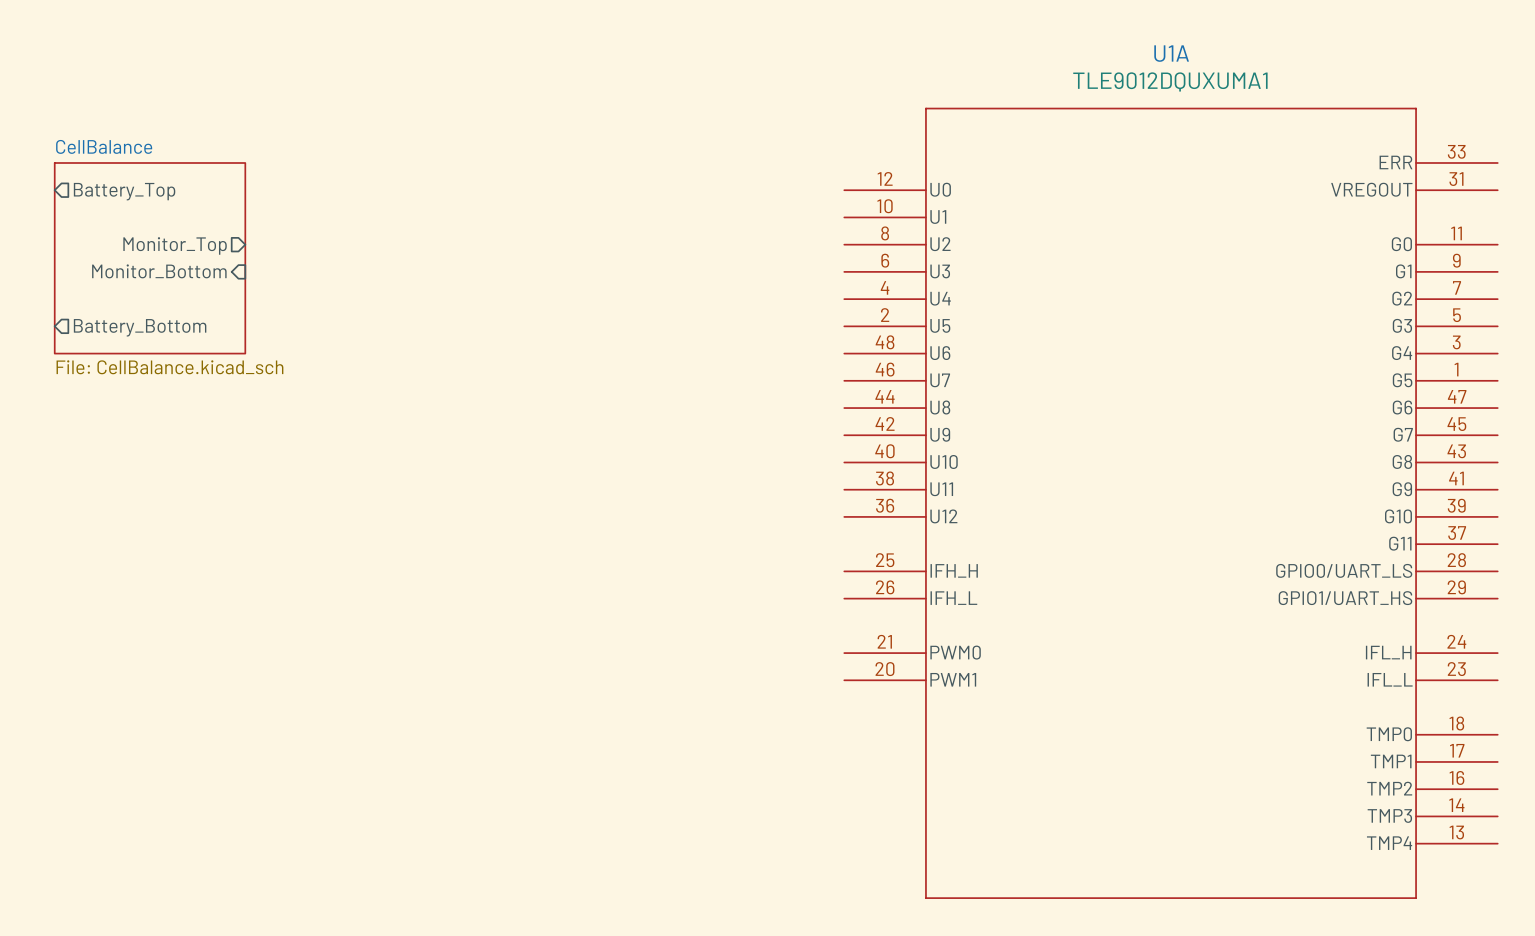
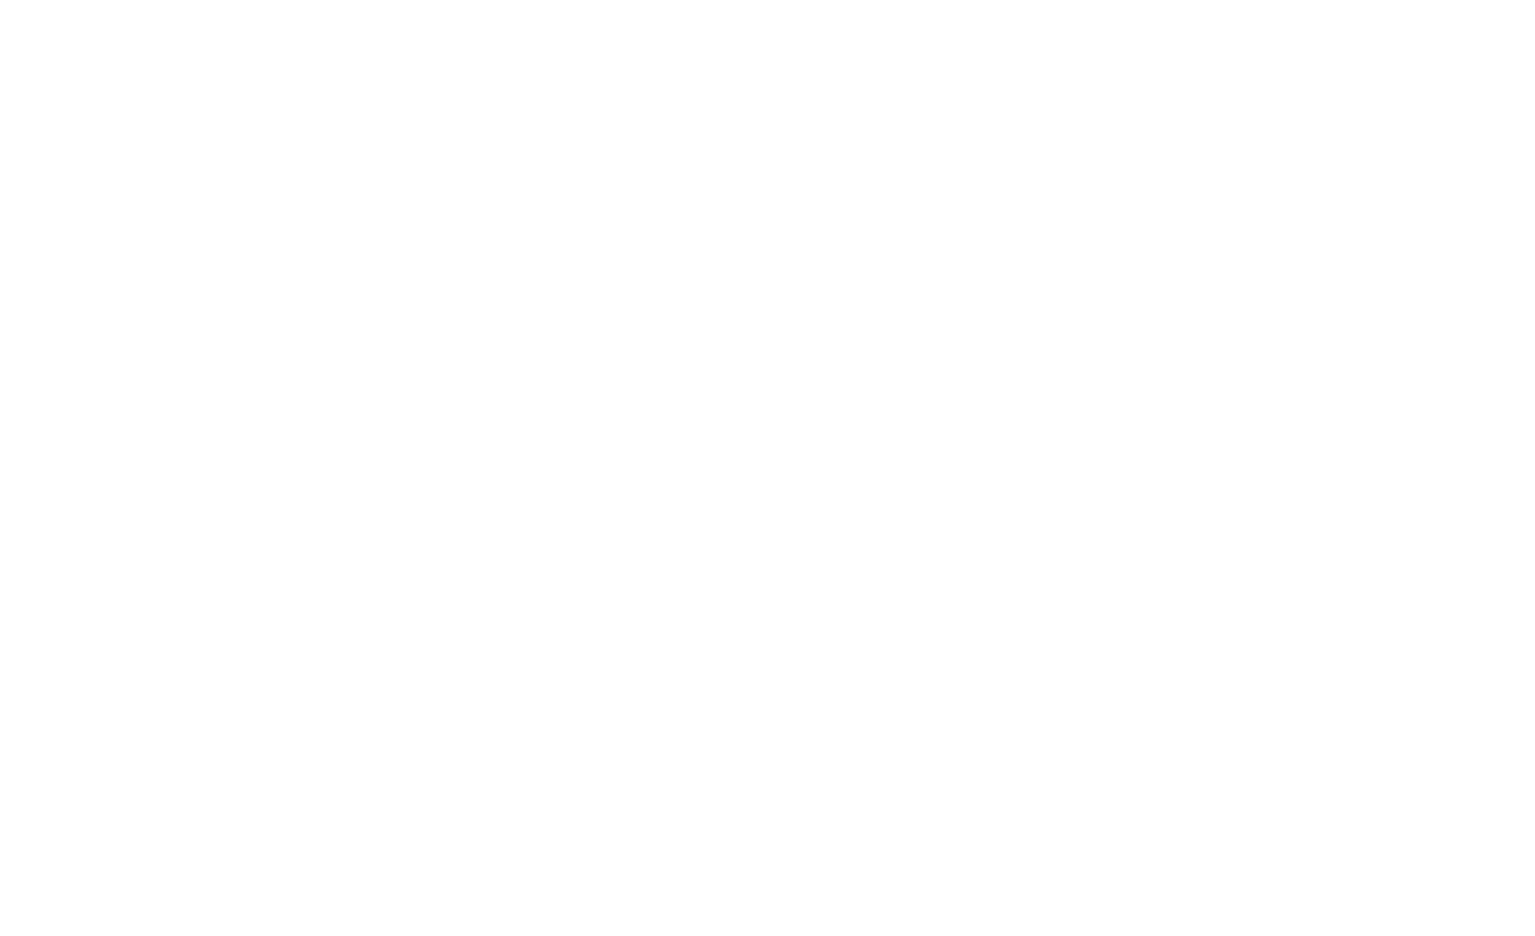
sheet pin: Battery_Top (124, 191) -> none
sheet pin: Monitor_Top (175, 245) -> none
sheet CellBalance: File: CellBalance.kicad_sch (150, 258) -> none
sheet pin: Monitor_Bottom (159, 271) -> none
sheet pin: Battery_Bottom (140, 327) -> none
U1A: TLE9012DQUXUMA1 (1171, 503) -> none

